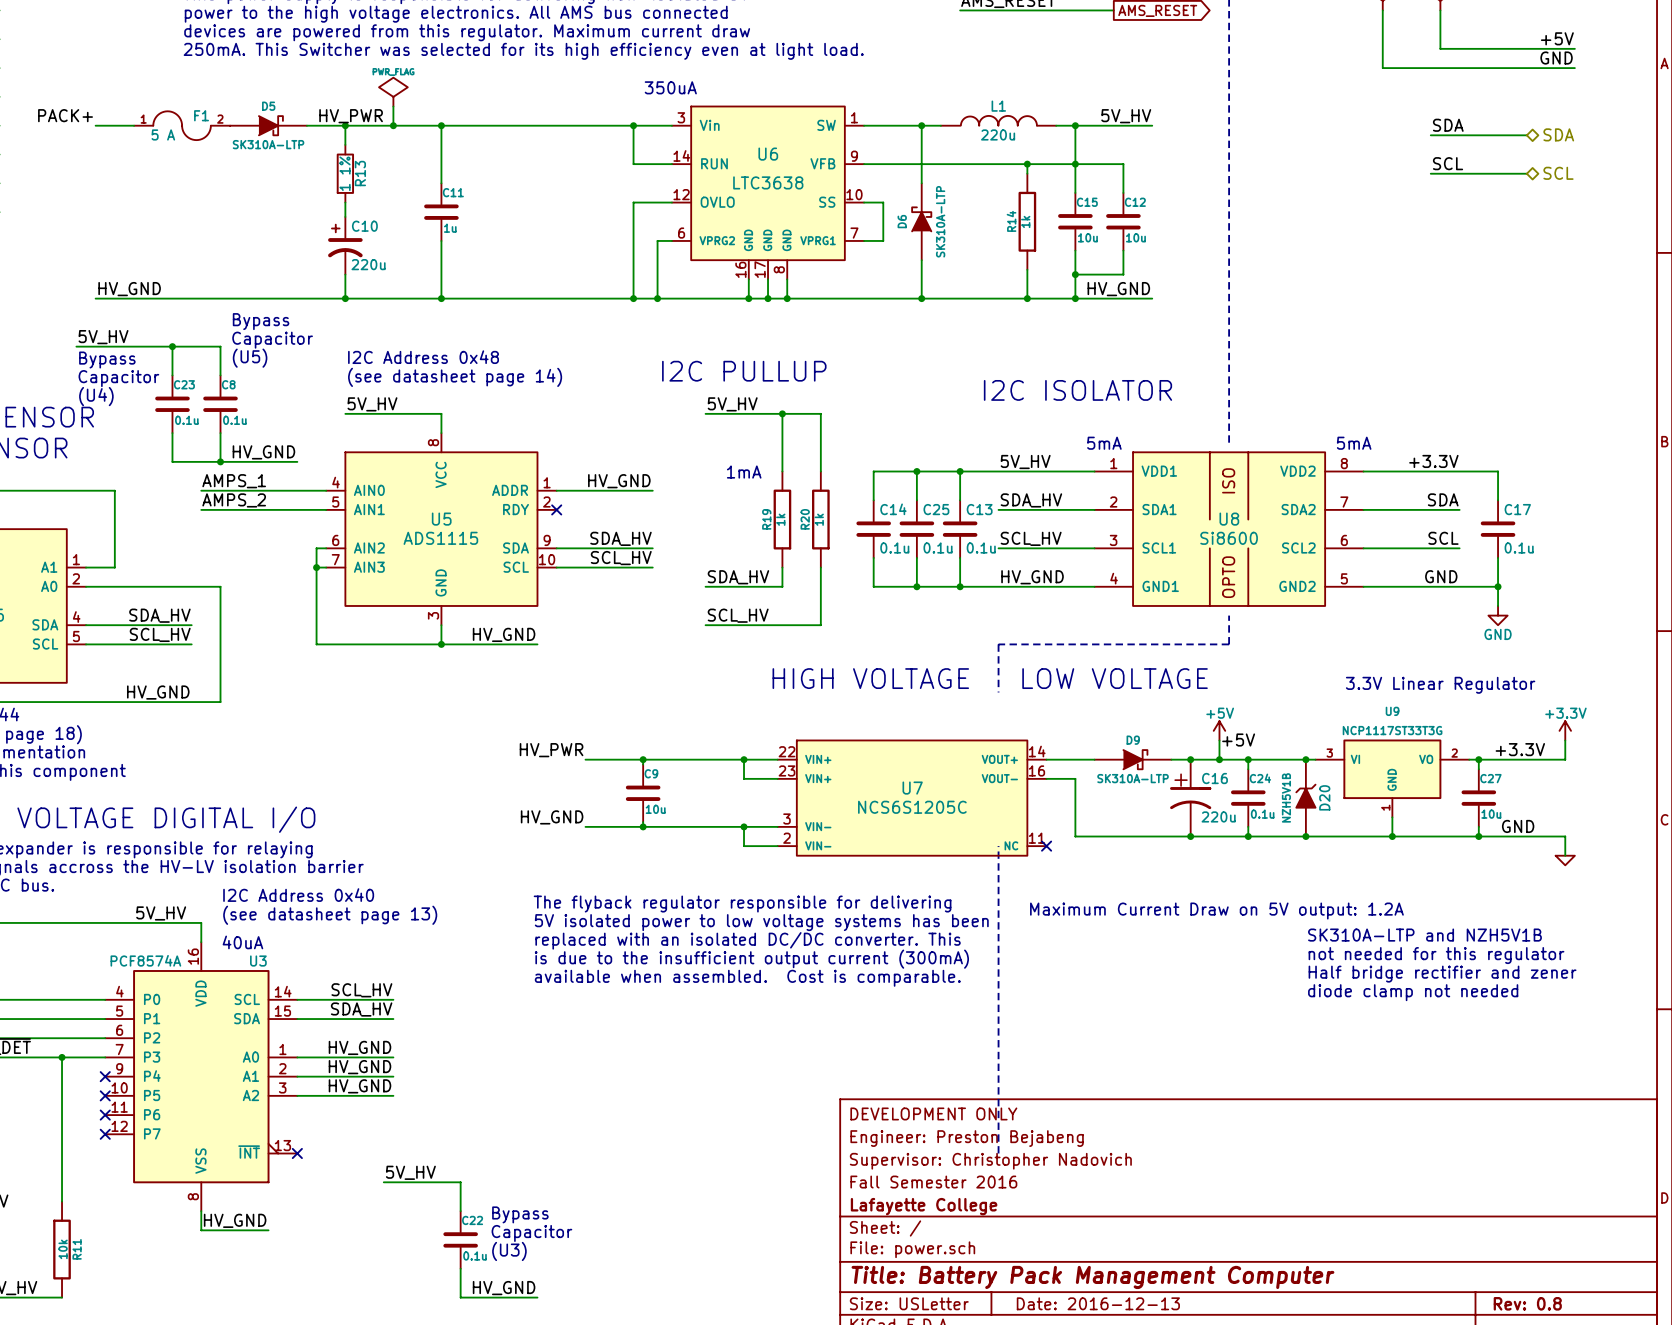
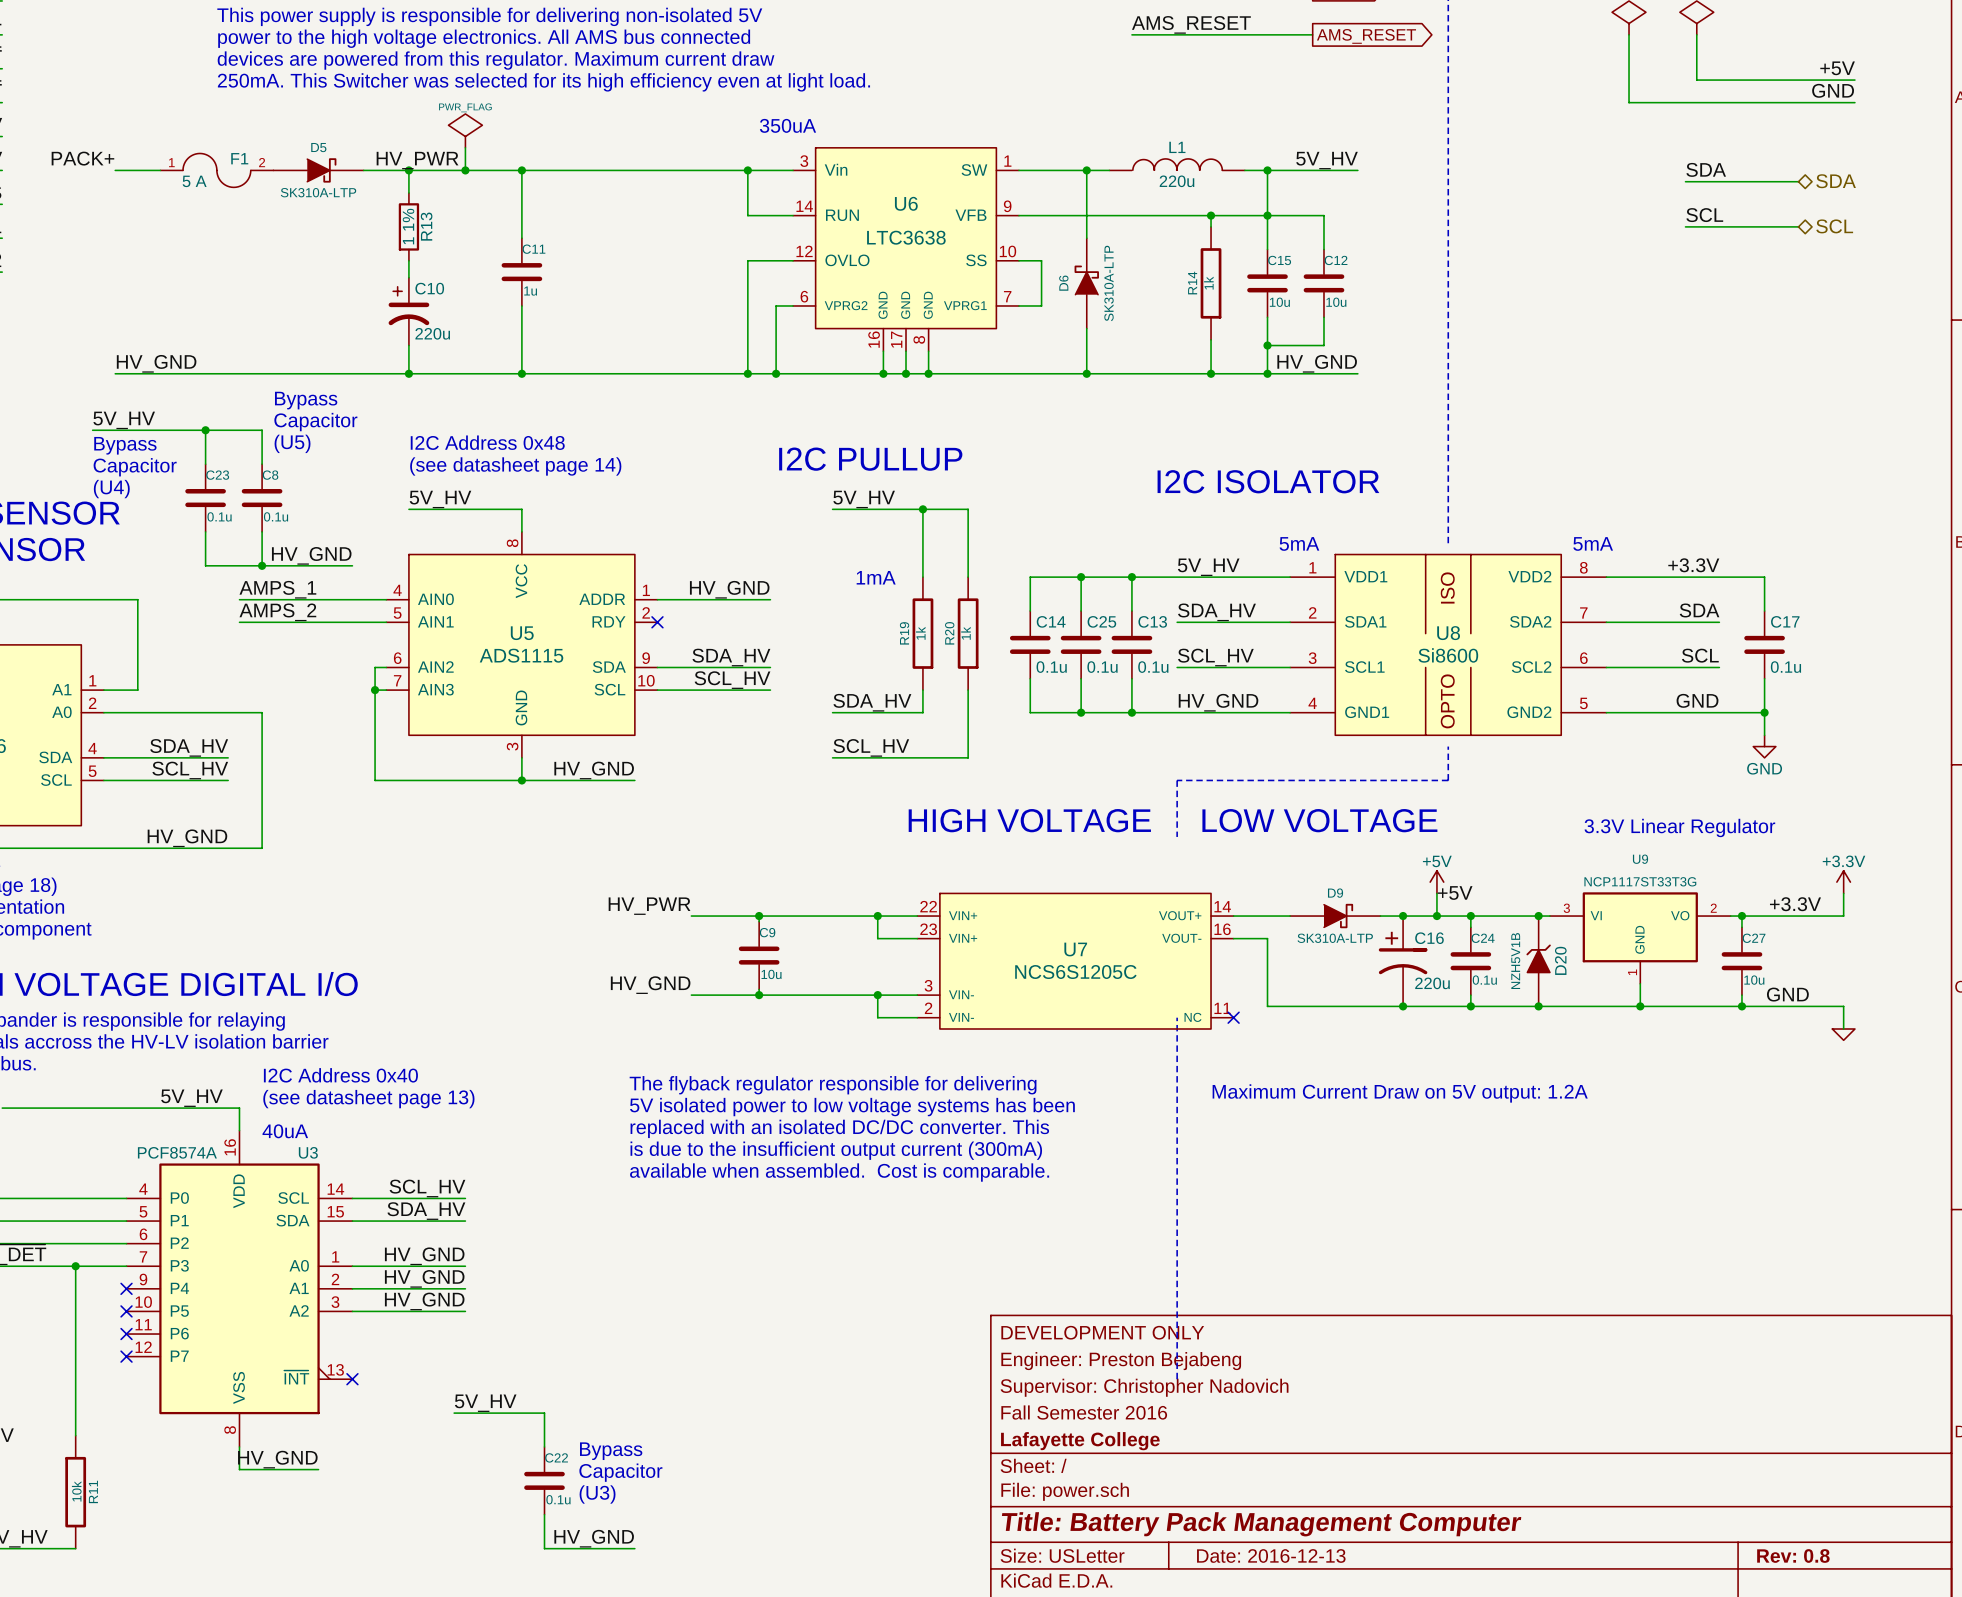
text: SK310A-LTP and NZH5V1B (1424, 935) -> none
text: not needed for this regulator (1436, 955) -> none
text: Half bridge rectifier and zener (1442, 974) -> none
text: diode clamp not needed (1413, 992) -> none

